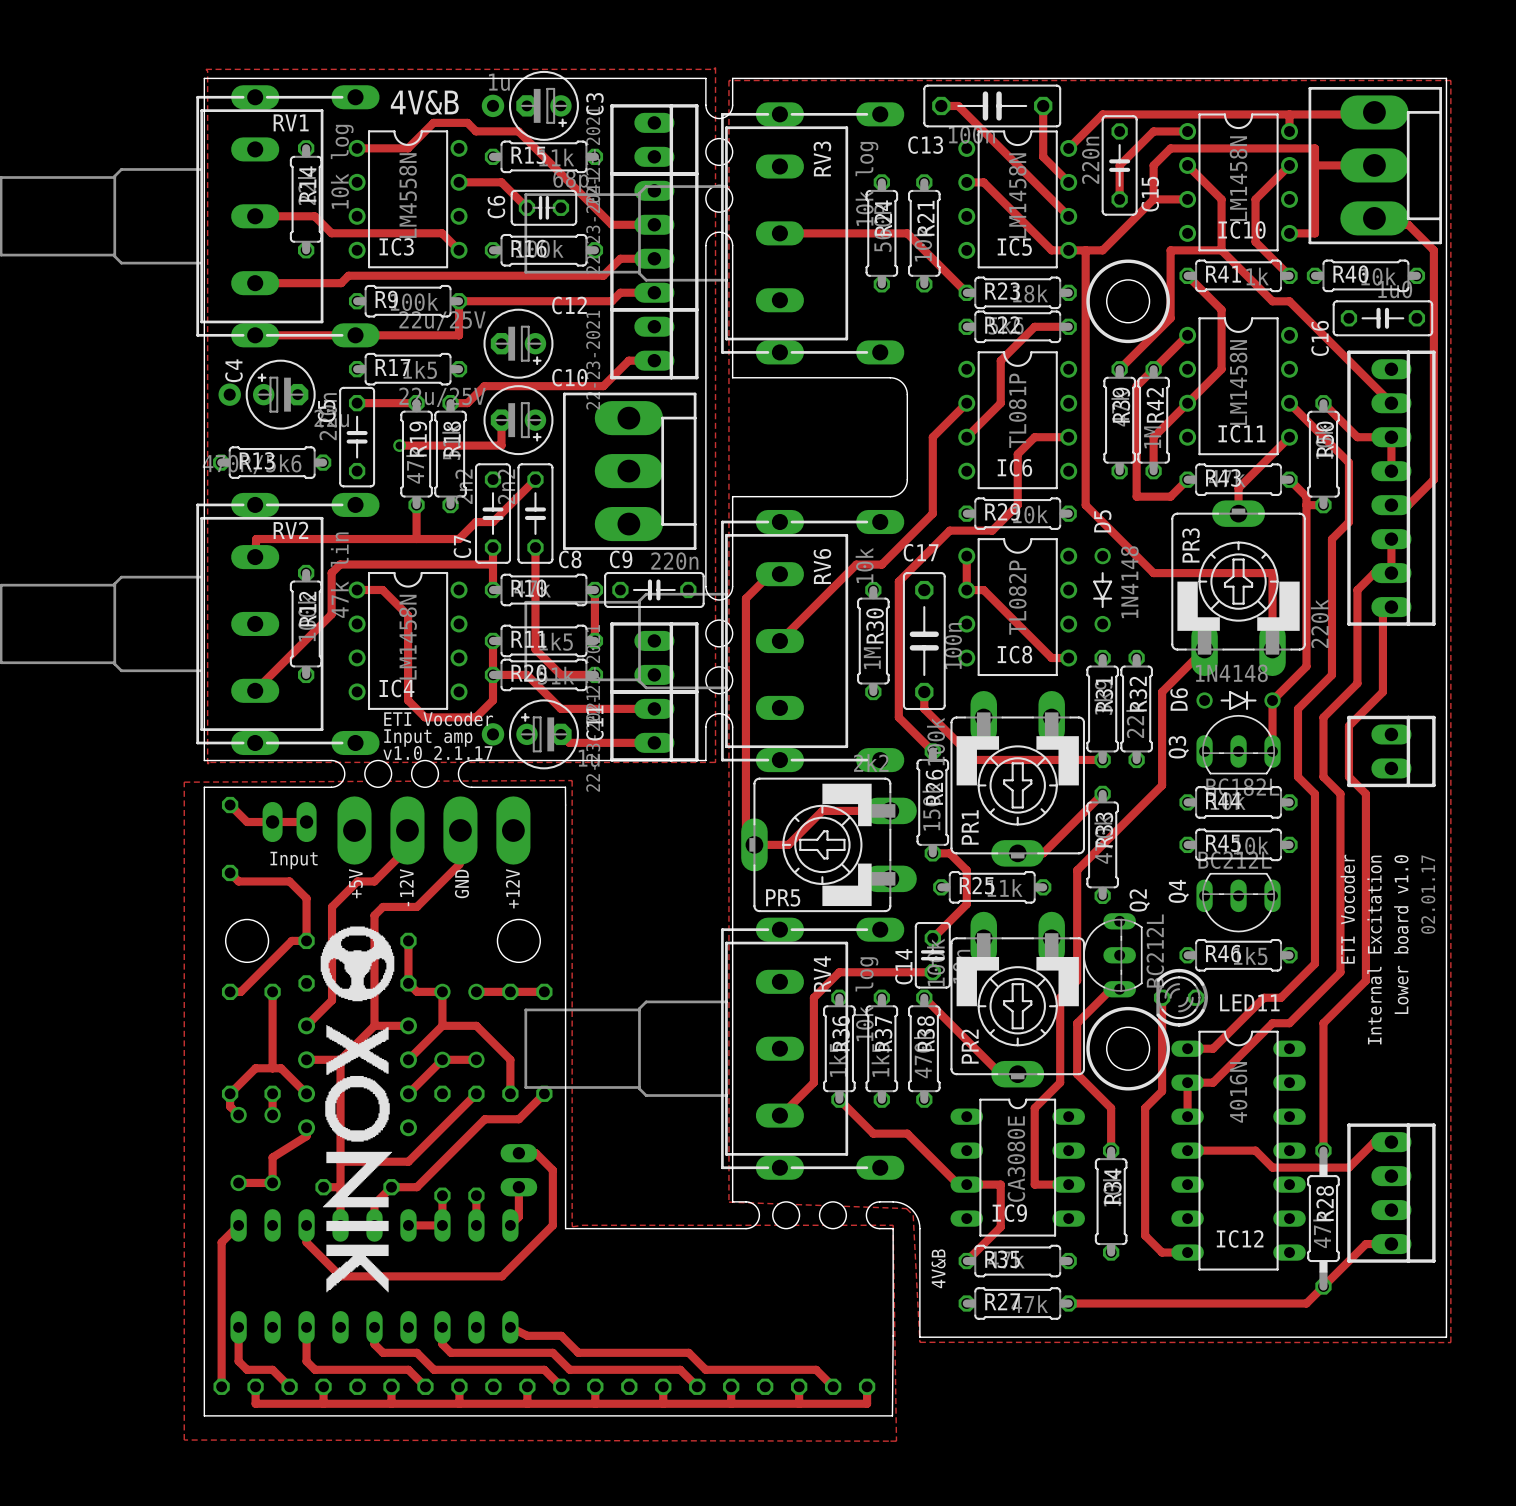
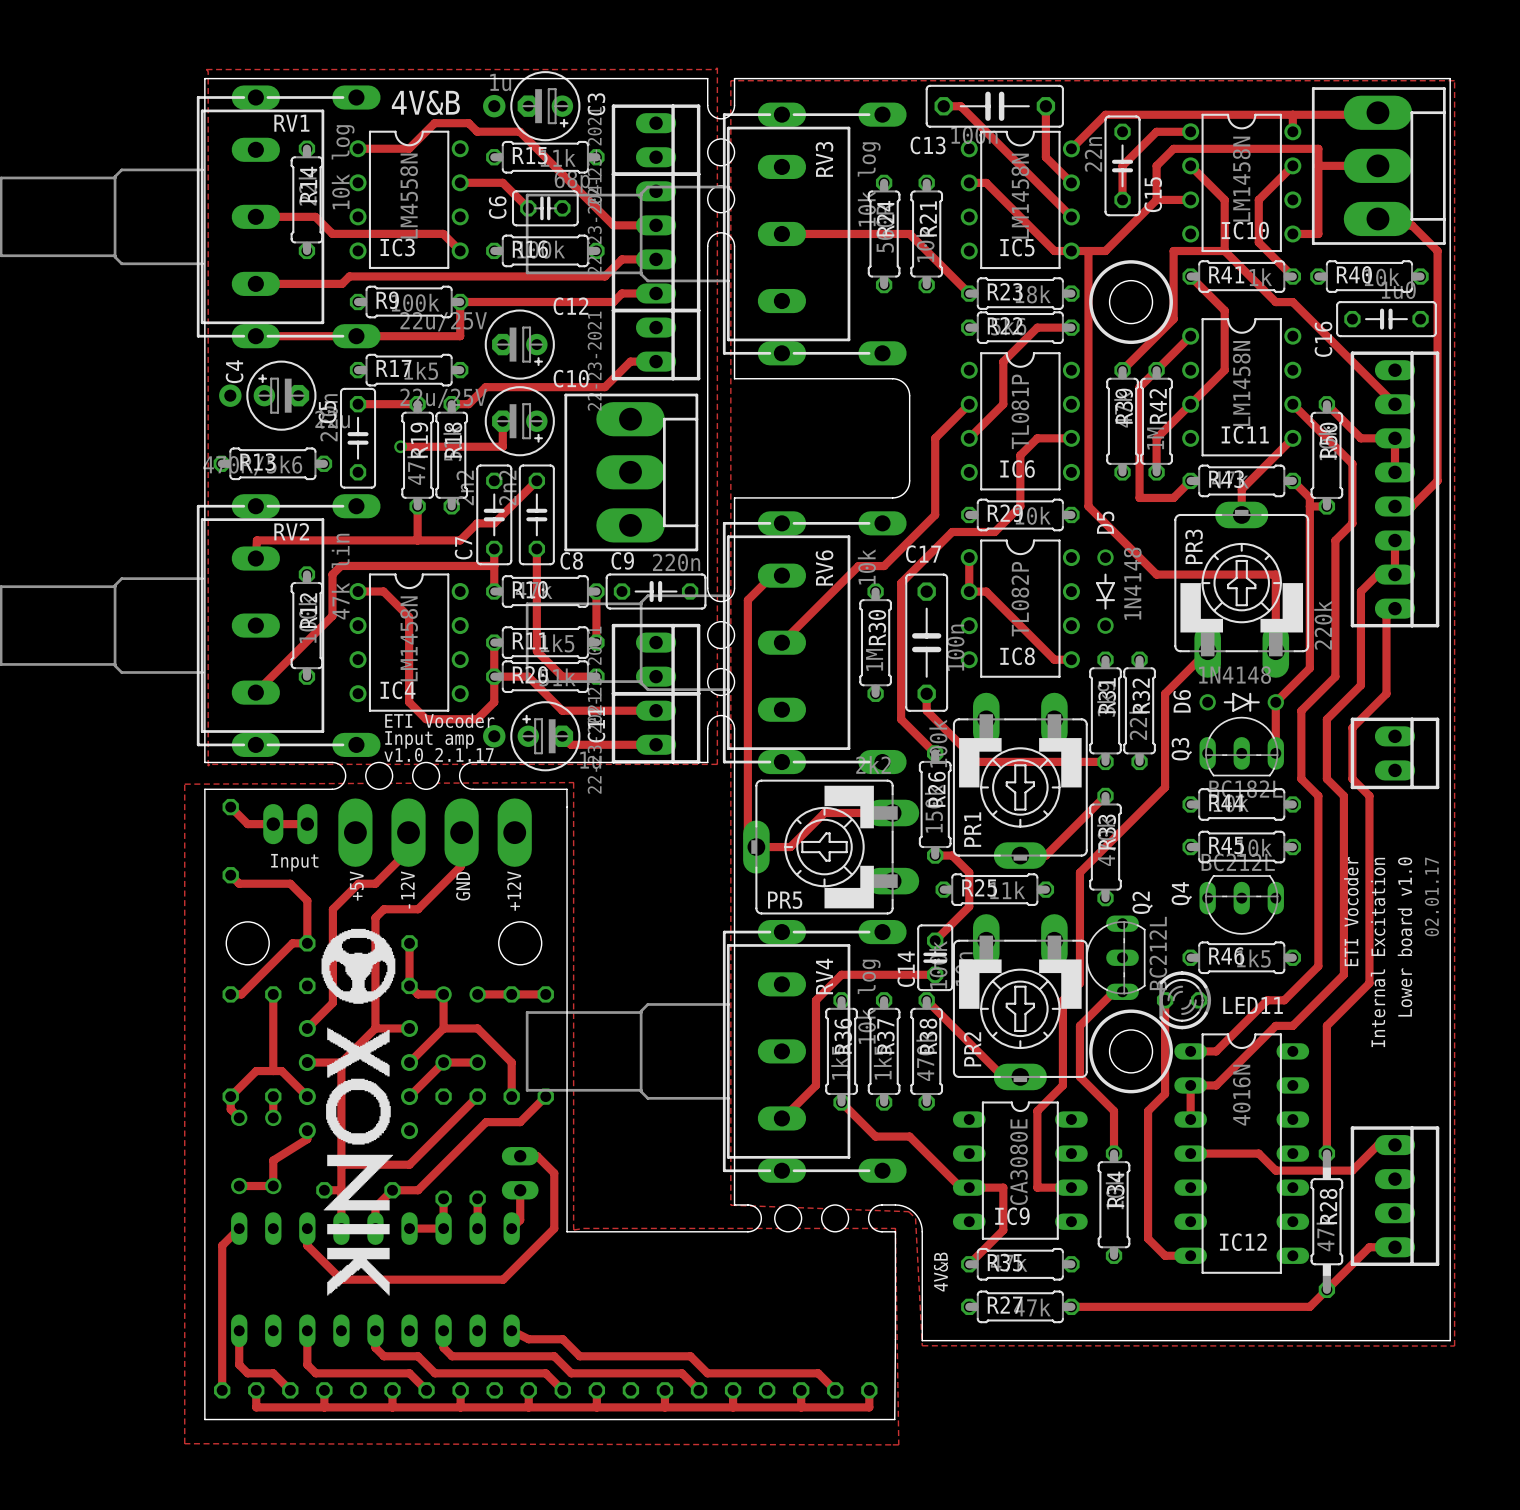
C15 value: 220n (1090, 160) -> 22n (1093, 154)

